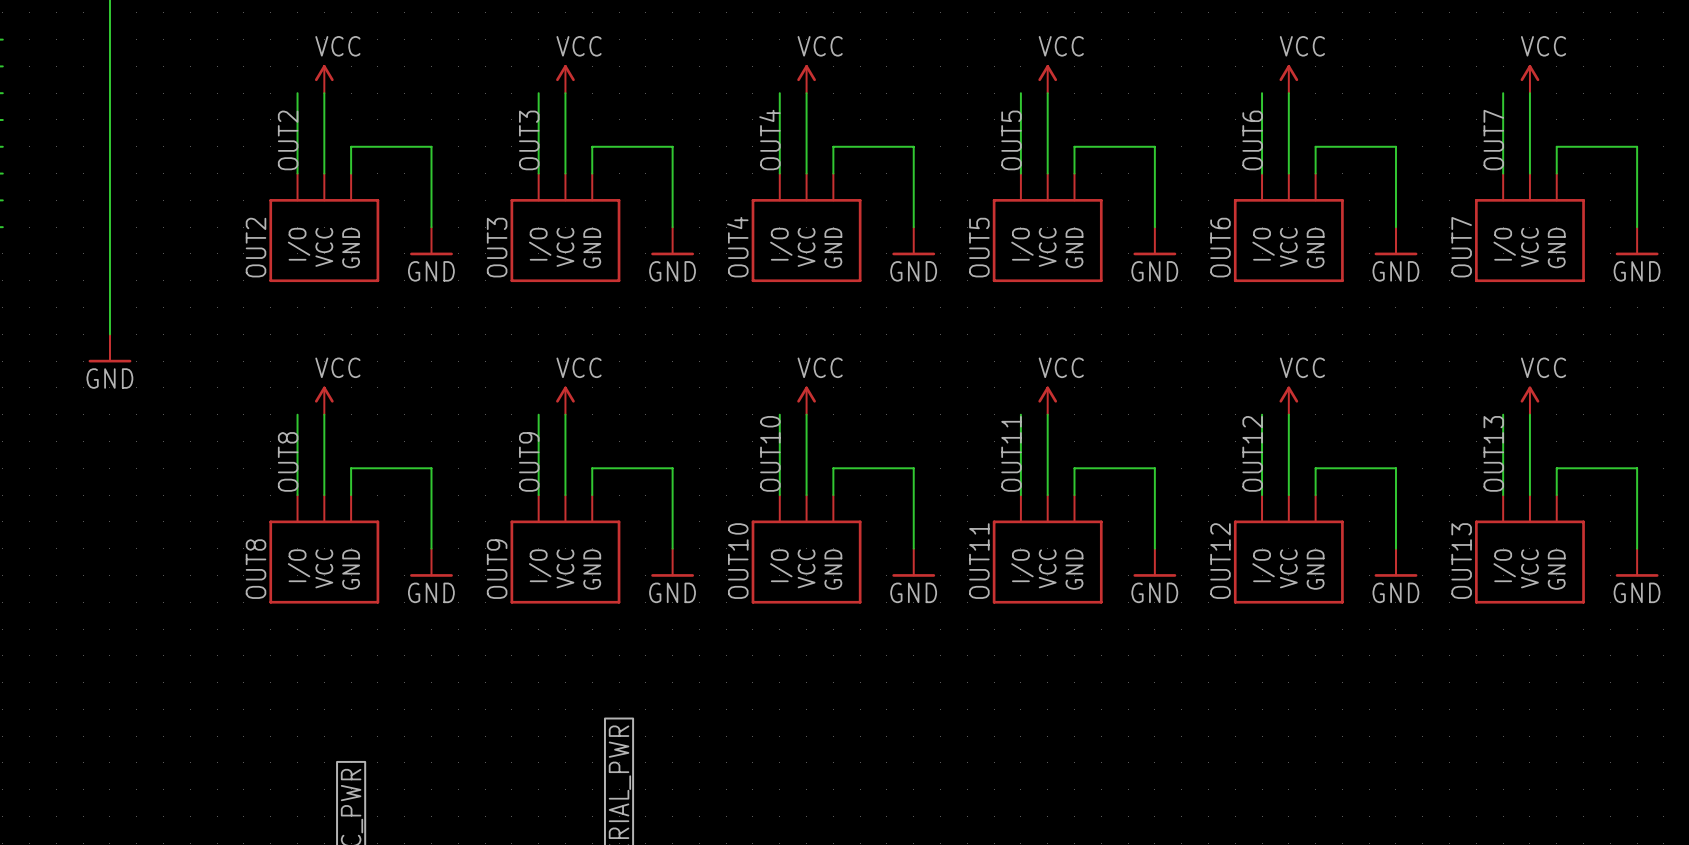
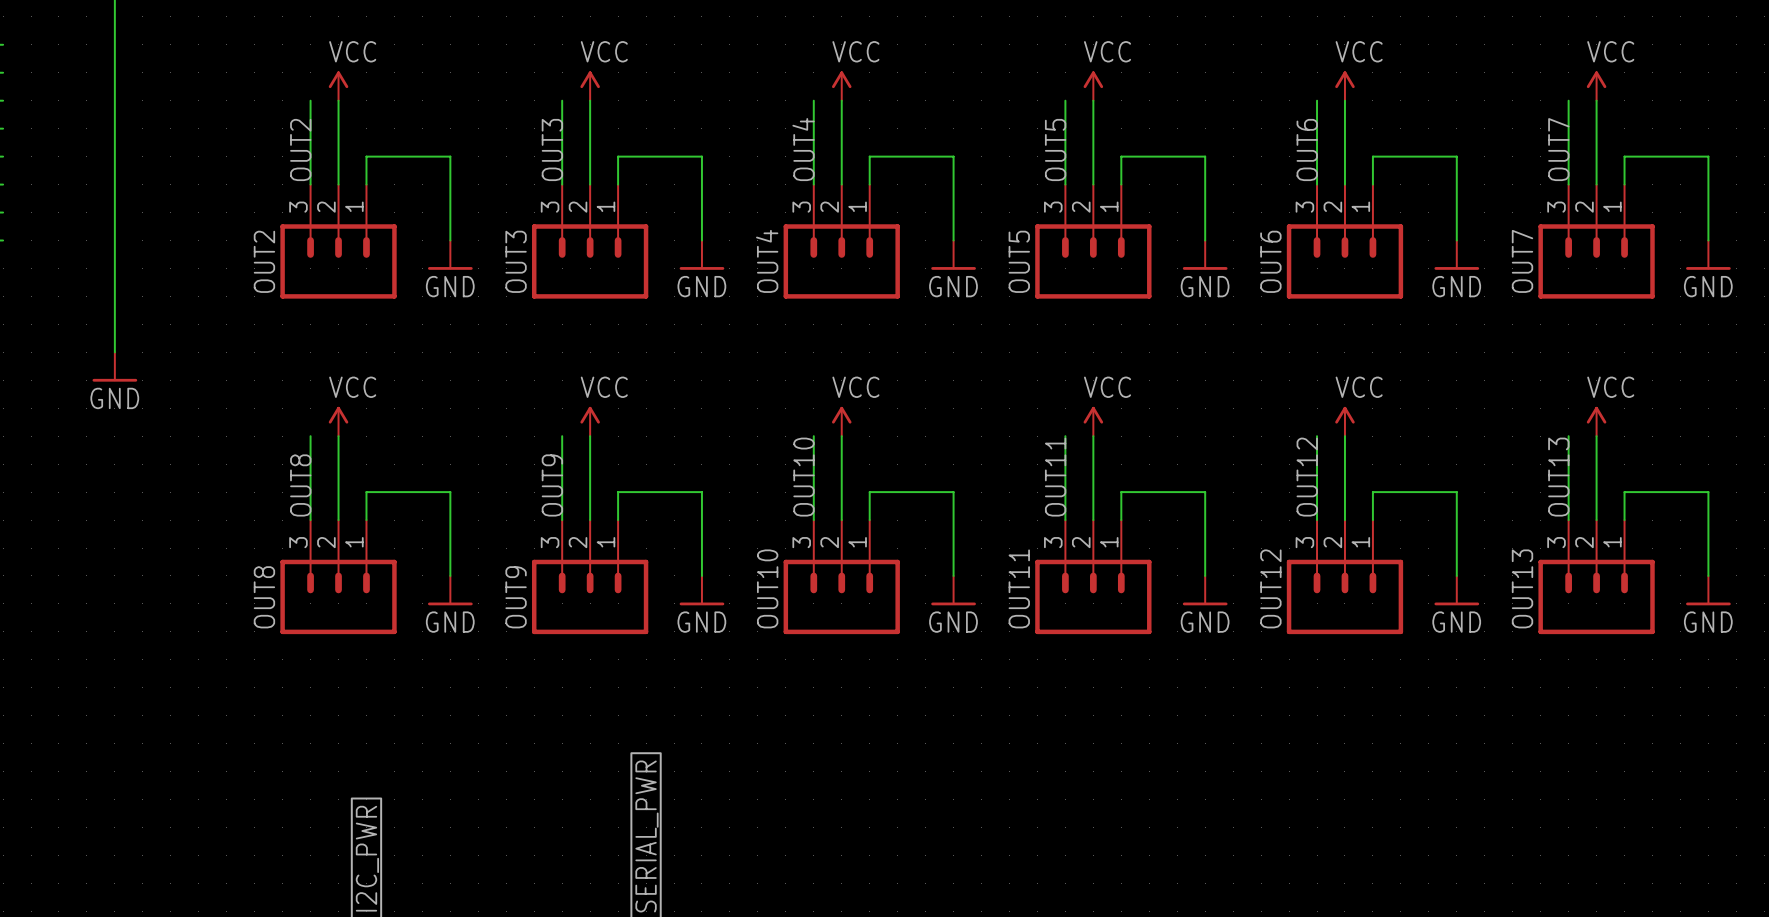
OUT2 symbol: [269, 173, 380, 283] -> [280, 184, 397, 299]
OUT3 symbol: [510, 173, 621, 283] -> [531, 184, 649, 299]
OUT4 symbol: [751, 173, 862, 283] -> [783, 184, 900, 299]
OUT5 symbol: [992, 173, 1103, 283] -> [1035, 184, 1152, 299]
OUT6 symbol: [1233, 173, 1344, 283] -> [1286, 184, 1404, 299]
OUT7 symbol: [1475, 173, 1585, 283] -> [1538, 184, 1655, 299]
OUT8 symbol: [269, 495, 380, 604] -> [280, 520, 397, 635]
OUT9 symbol: [510, 495, 621, 604] -> [531, 520, 649, 635]
OUT10 symbol: [751, 495, 862, 604] -> [783, 520, 900, 635]
OUT11 symbol: [992, 495, 1103, 604] -> [1035, 520, 1152, 635]
OUT12 symbol: [1233, 495, 1344, 604] -> [1286, 520, 1404, 635]
OUT13 symbol: [1475, 495, 1585, 604] -> [1538, 520, 1655, 635]

